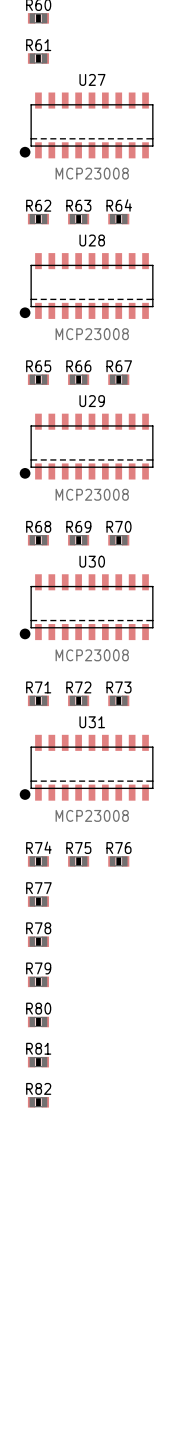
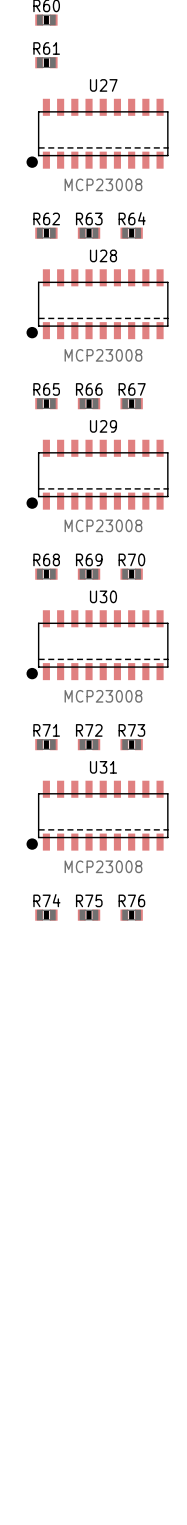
R77: (38, 901) -> none
R78: (38, 941) -> none
R79: (38, 981) -> none
R80: (38, 1022) -> none
R81: (38, 1062) -> none
R82: (38, 1102) -> none

